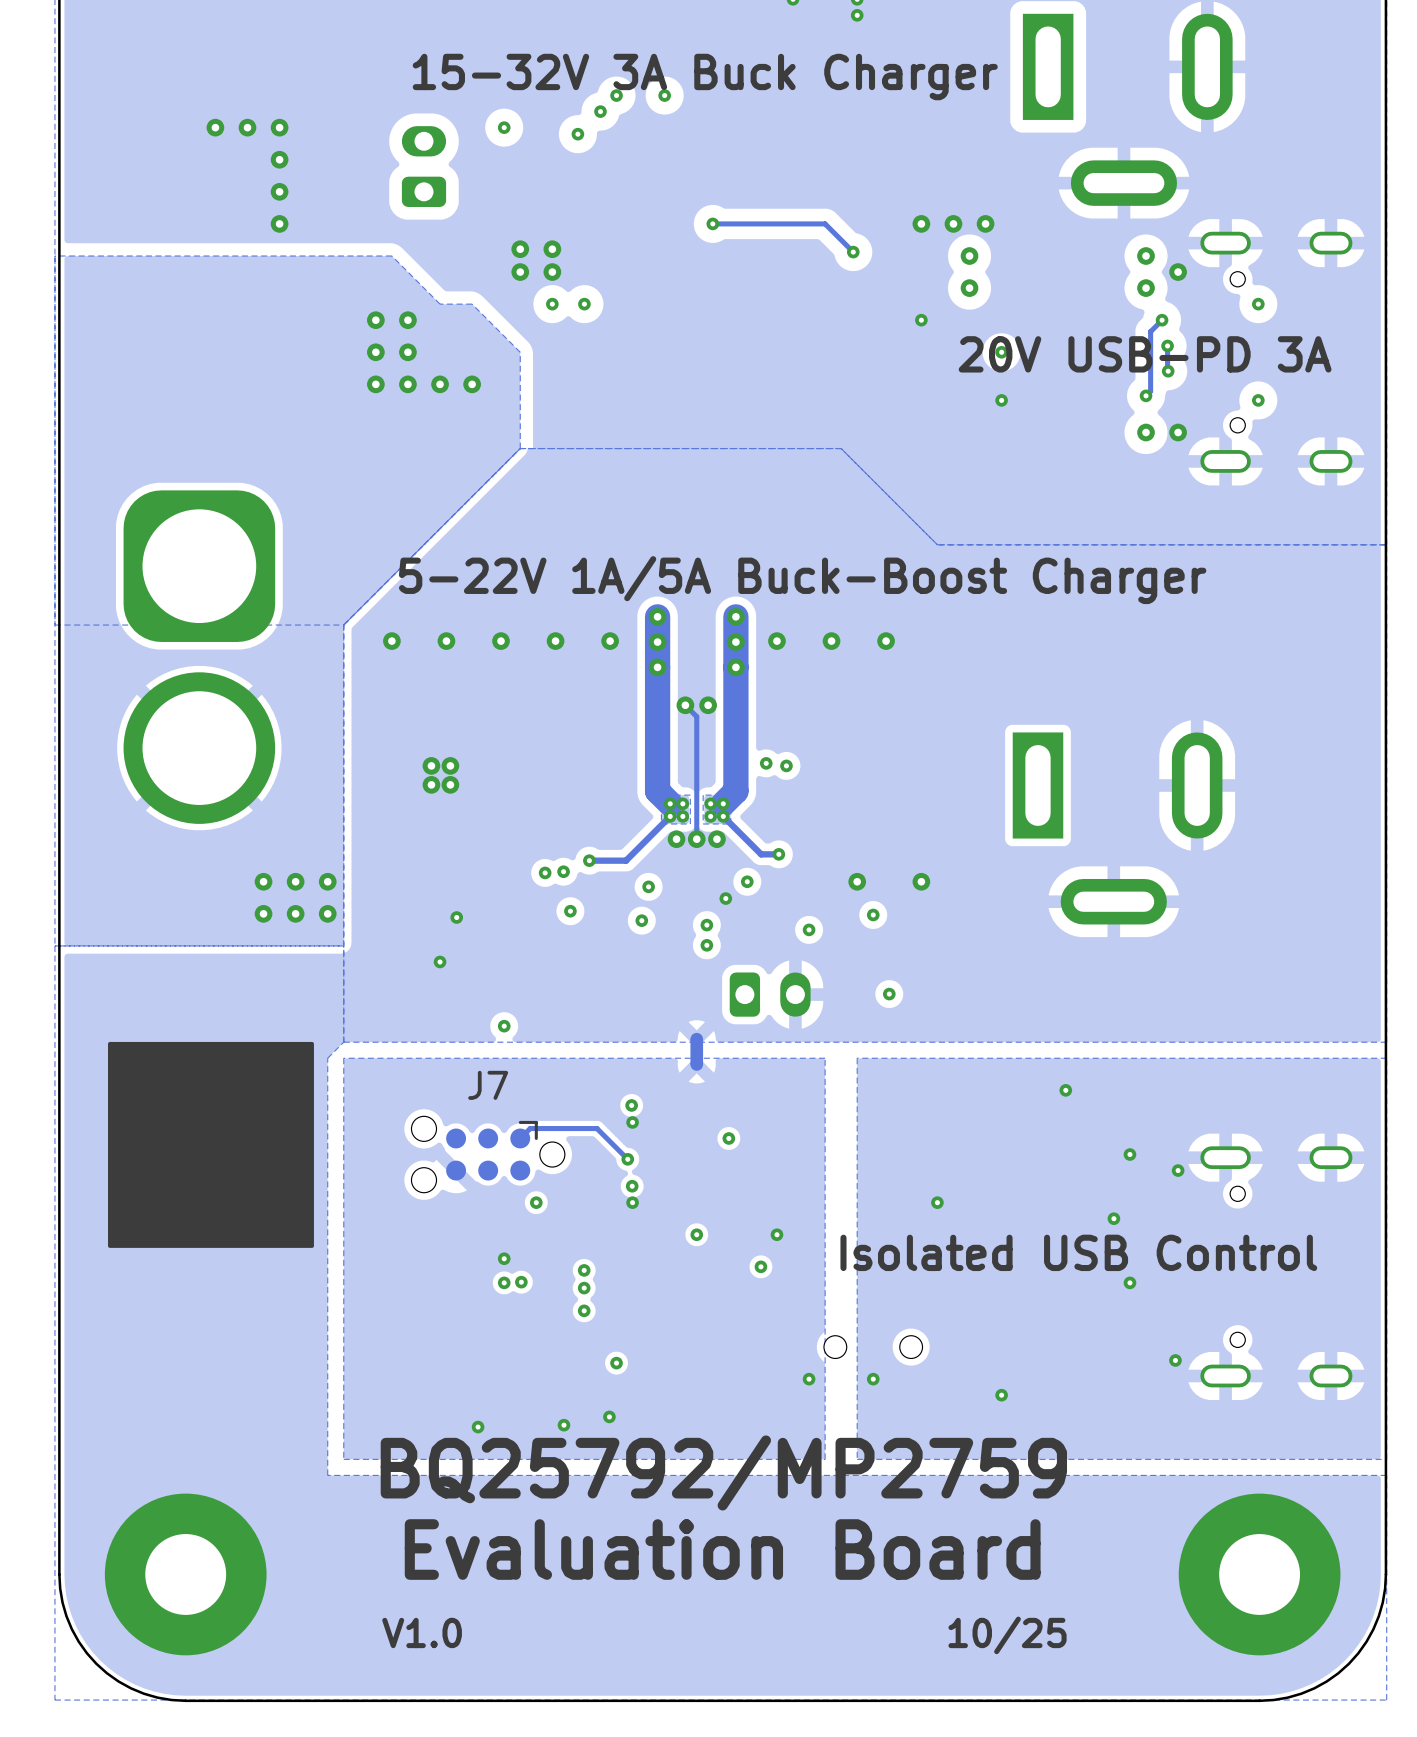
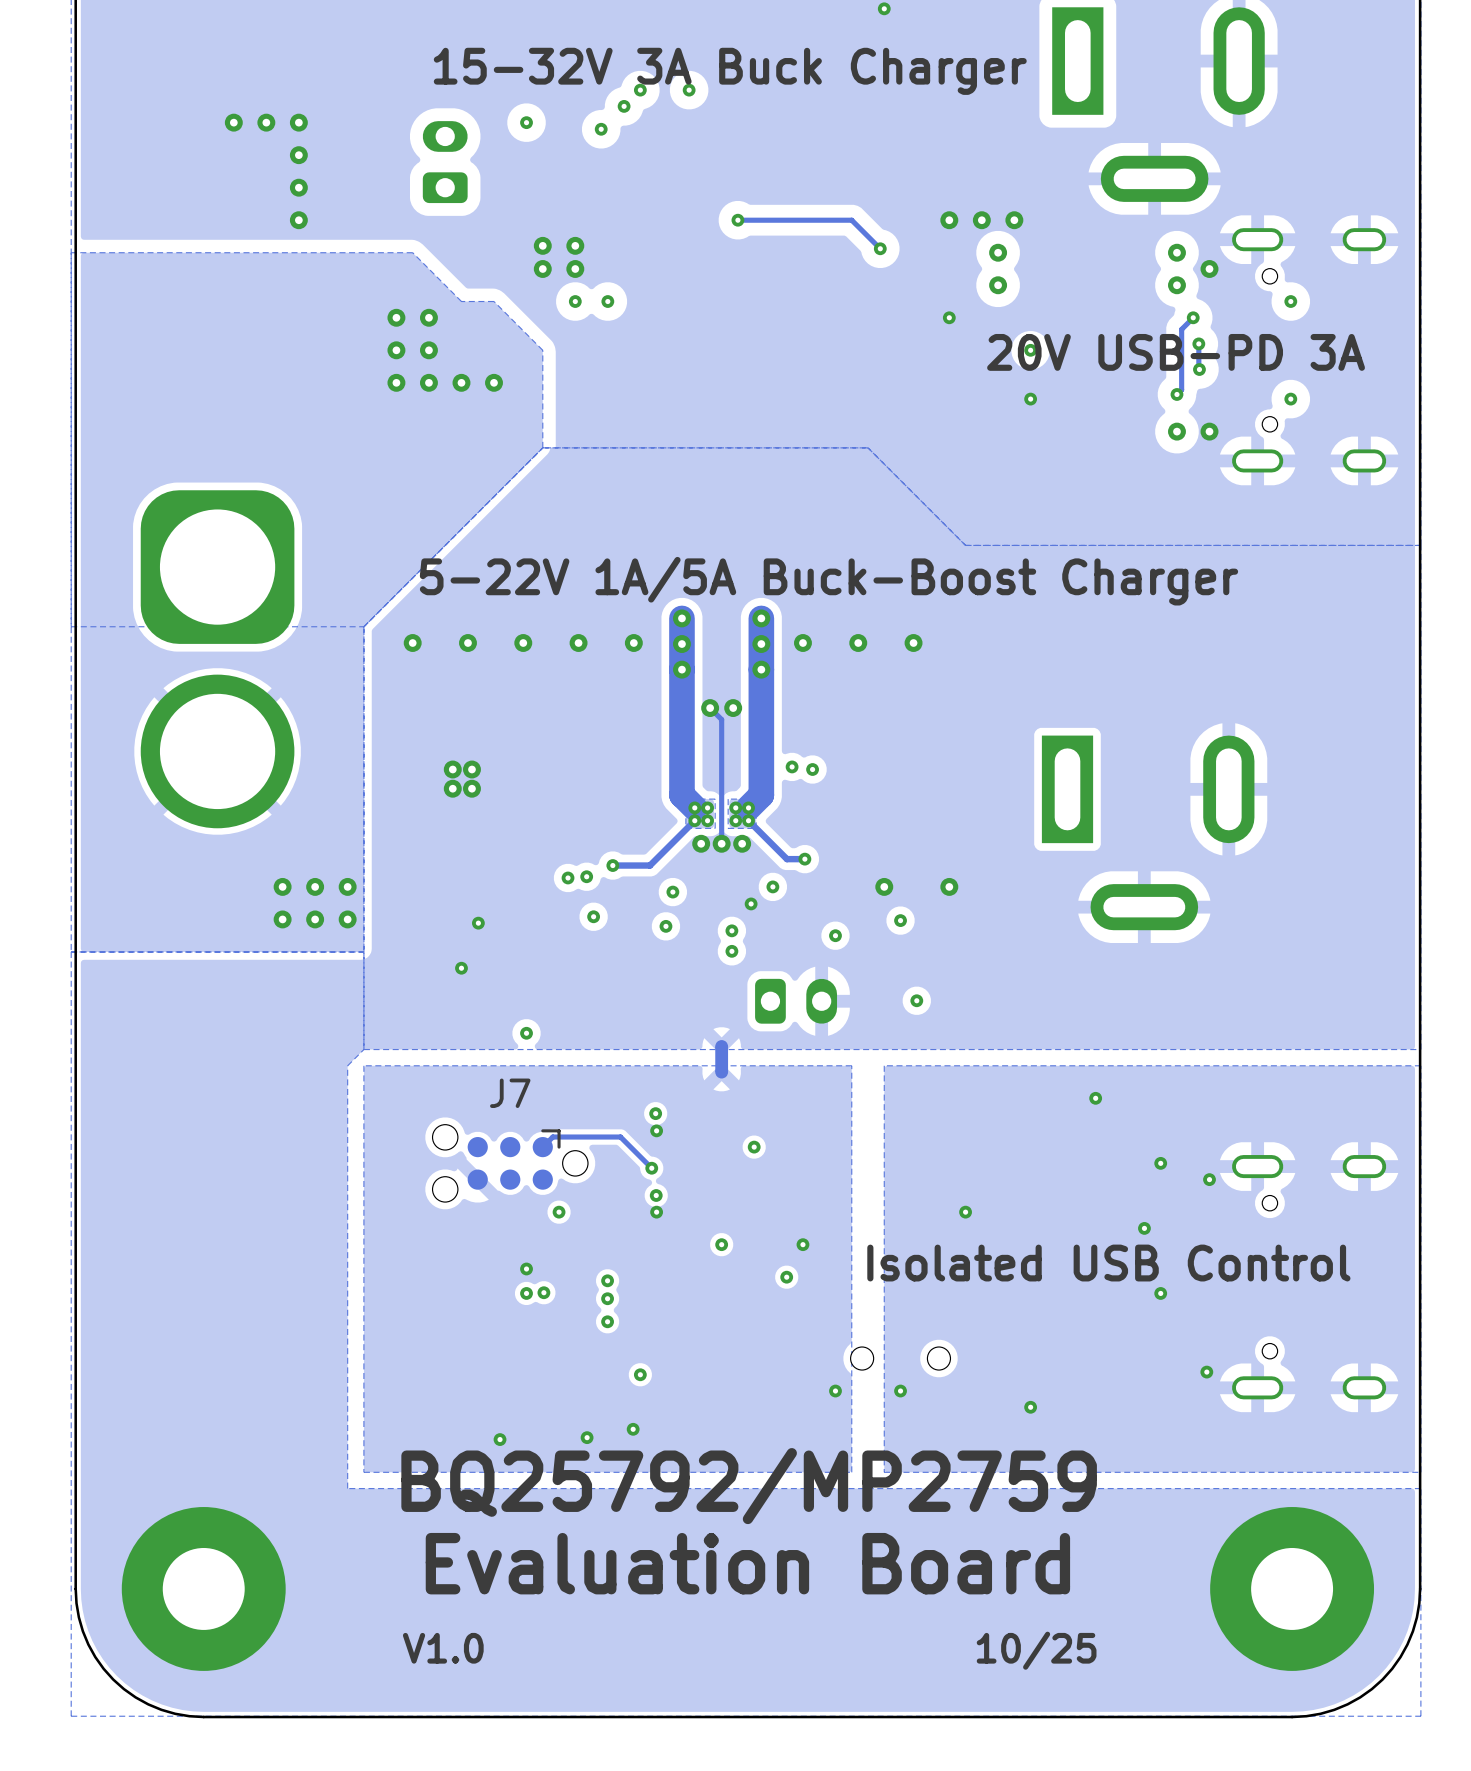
drawing: [108, 1041, 314, 1248] -> none

